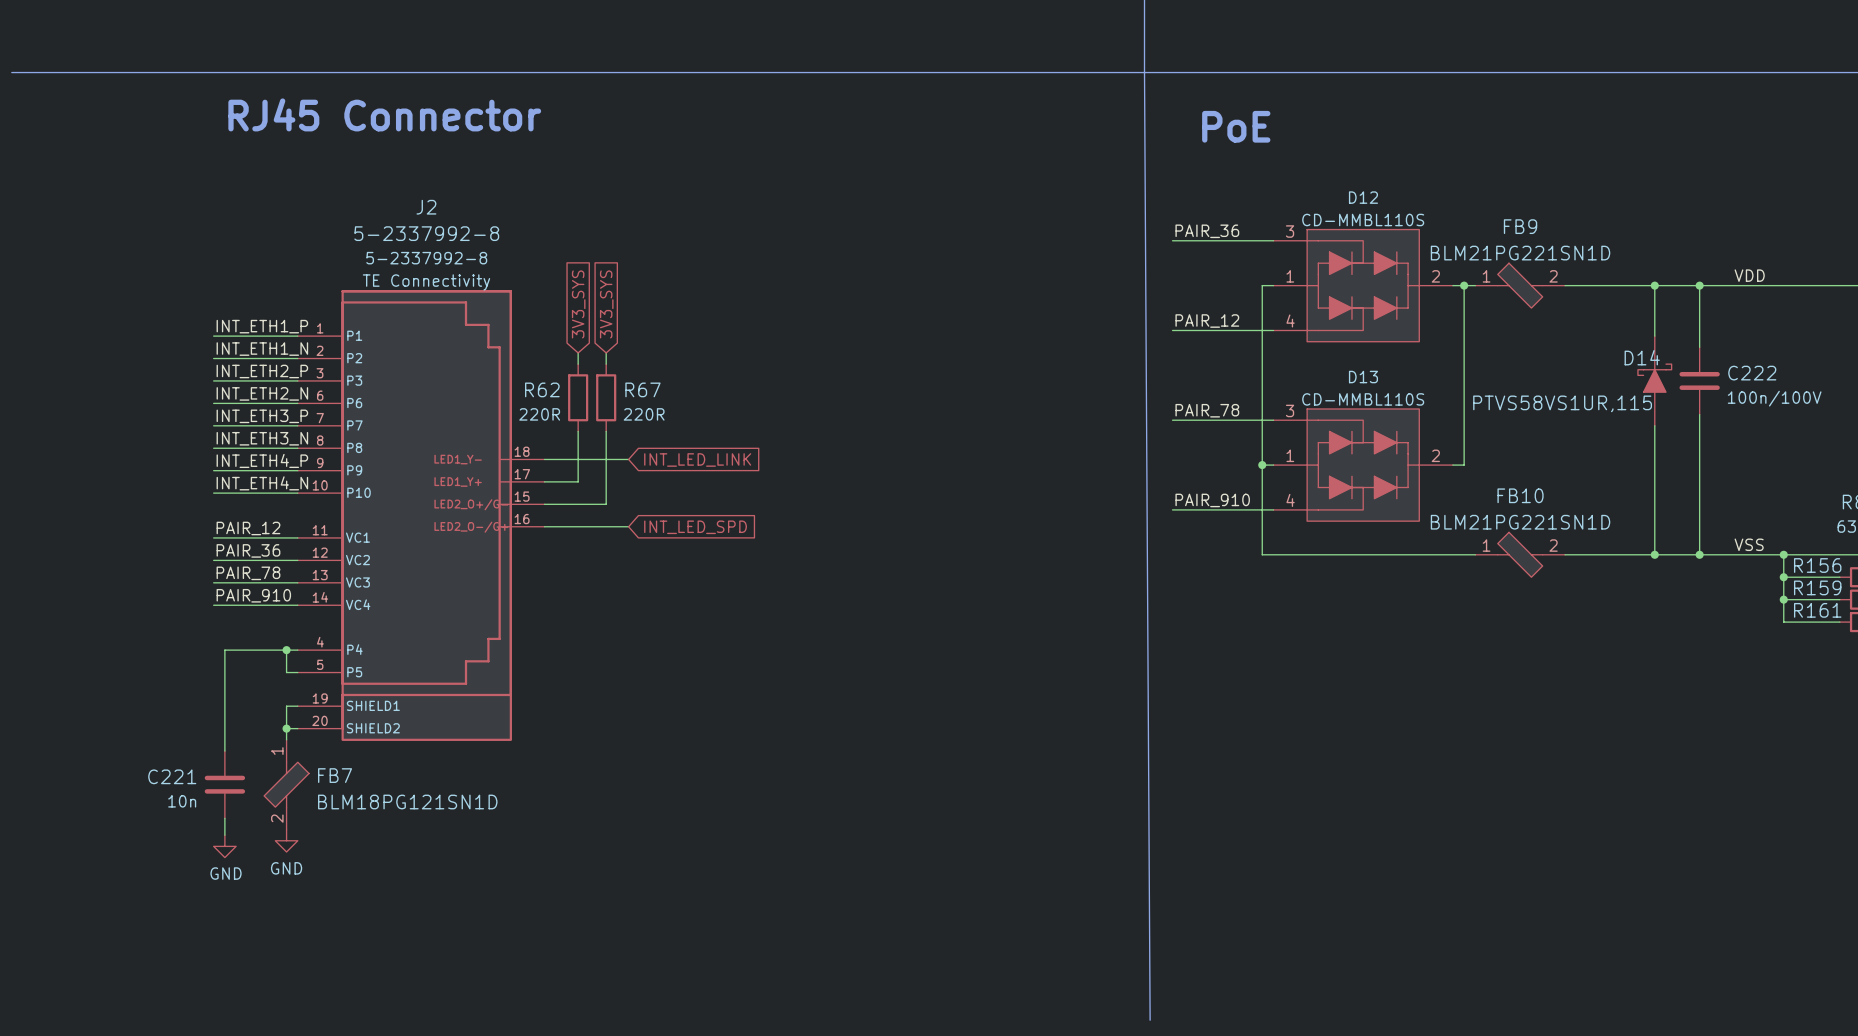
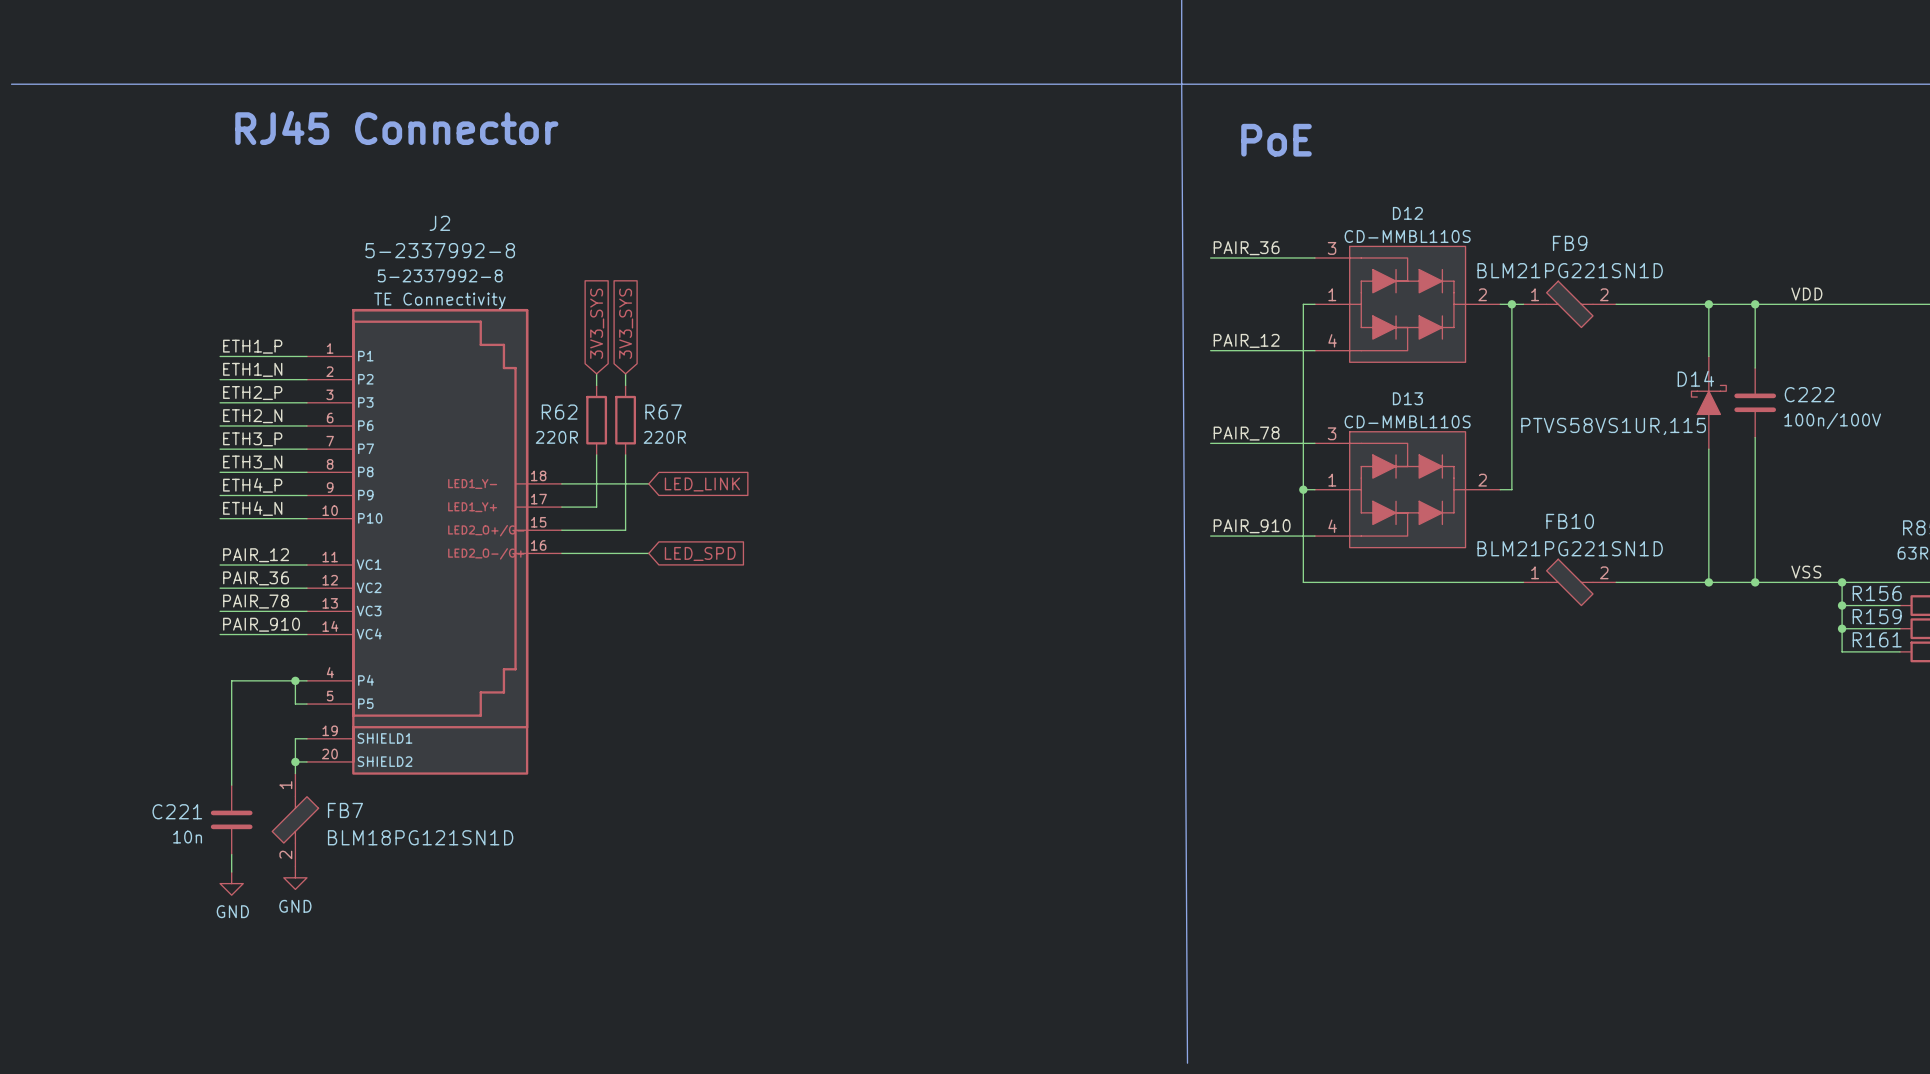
label: INT_ETH1_P (262, 326) -> ETH1_P (252, 346)
label: INT_ETH1_N (262, 349) -> ETH1_N (252, 369)
label: INT_ETH2_P (262, 371) -> ETH2_P (252, 393)
label: INT_ETH2_N (262, 393) -> ETH2_N (252, 416)
label: INT_ETH3_P (262, 416) -> ETH3_P (252, 439)
label: INT_ETH3_N (262, 438) -> ETH3_N (252, 462)
label: INT_ETH4_P (262, 460) -> ETH4_P (252, 485)
global label: INT_LED_LINK (697, 460) -> LED_LINK (702, 484)
label: INT_ETH4_N (262, 483) -> ETH4_N (252, 508)
global label: INT_LED_SPD (695, 527) -> LED_SPD (700, 553)

